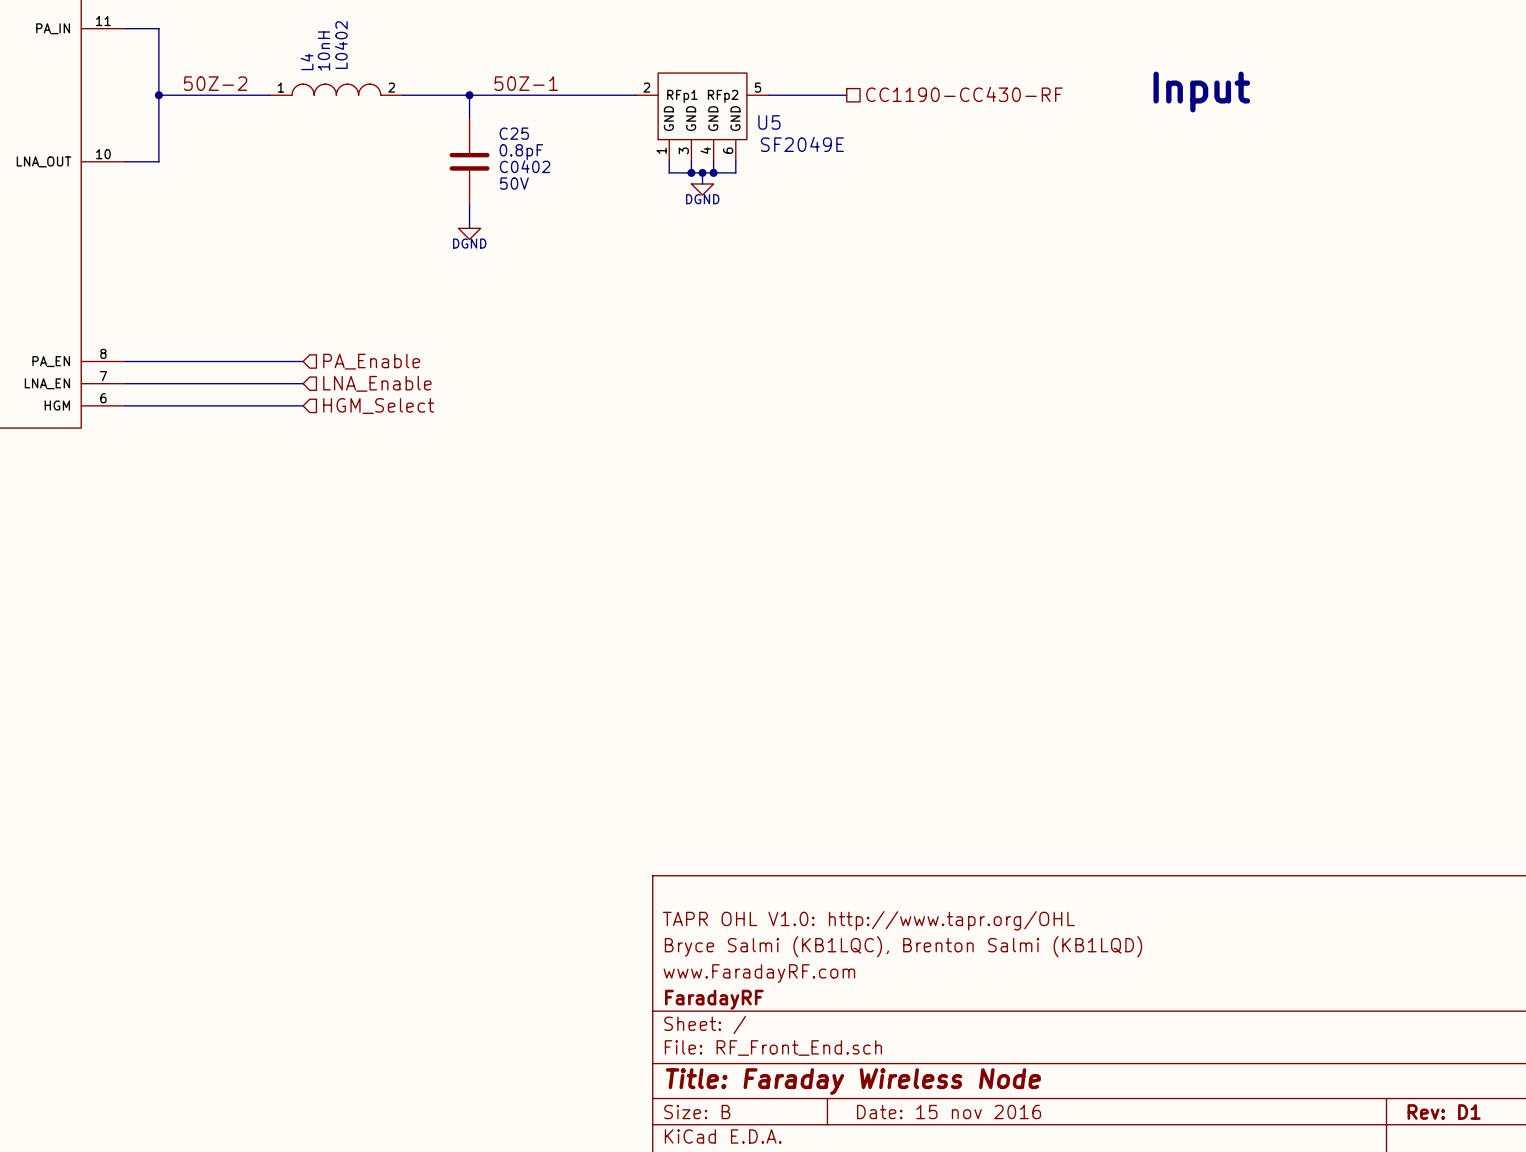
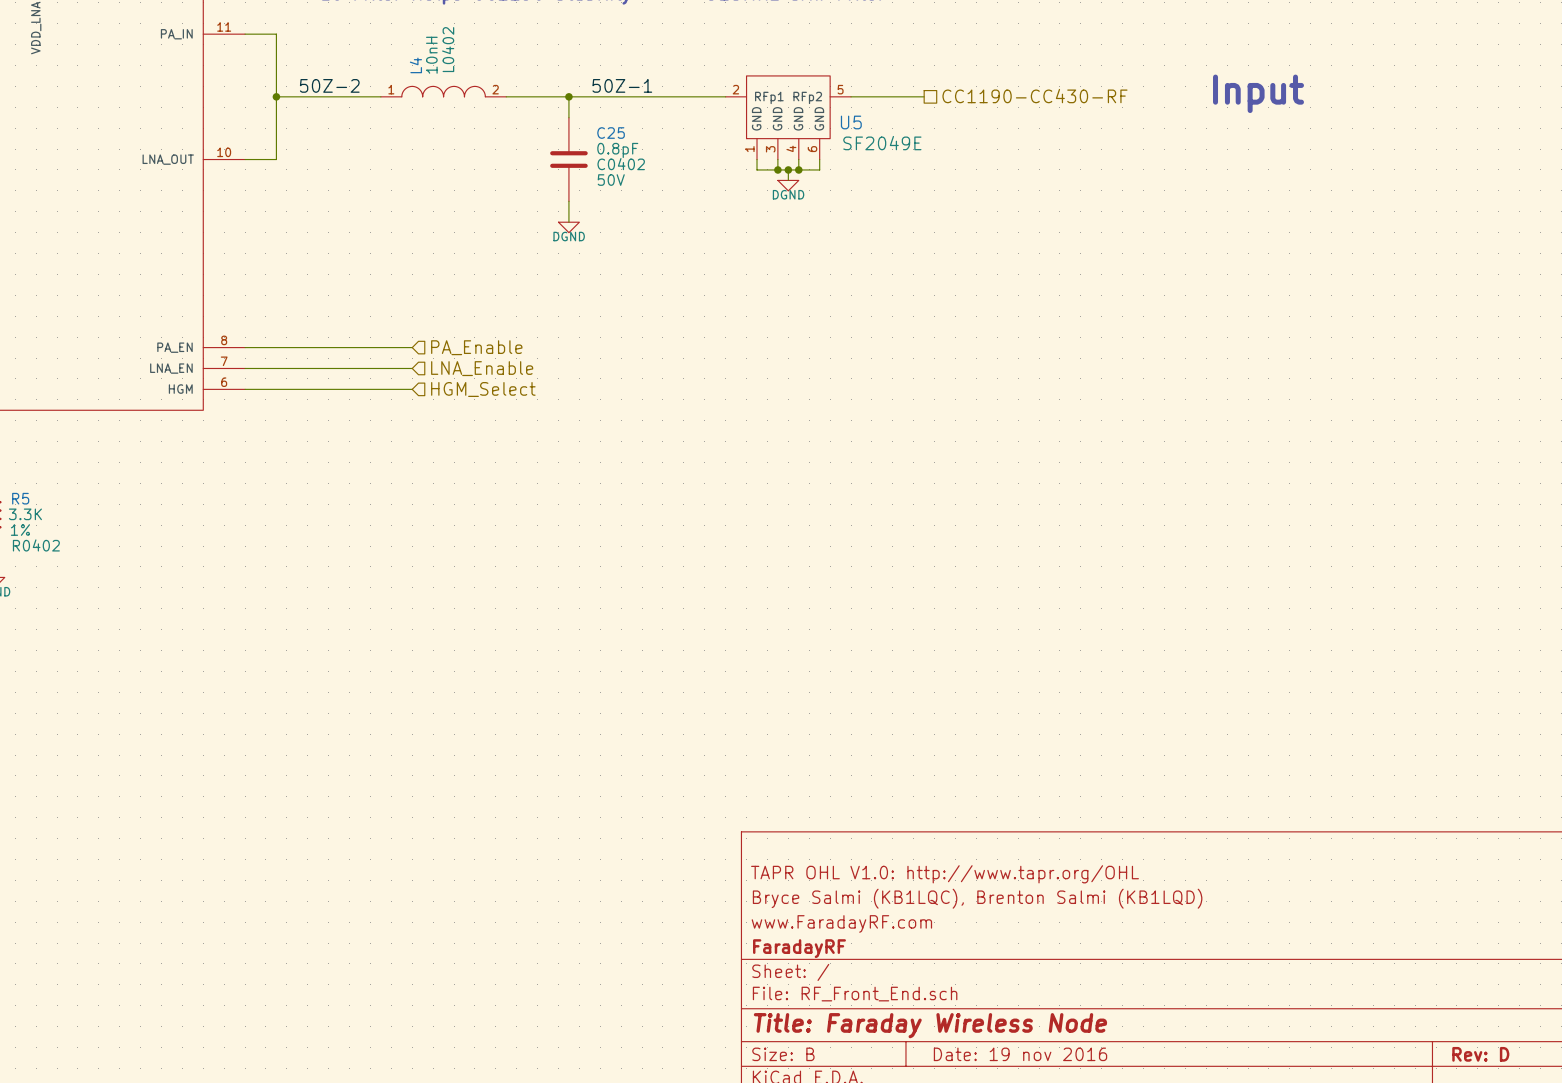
title block: Date: 15 nov 2016 (949, 1112) -> Date: 19 nov 2016 (1020, 1054)
title block: Rev: D1 (1444, 1112) -> Rev: D (1480, 1054)

